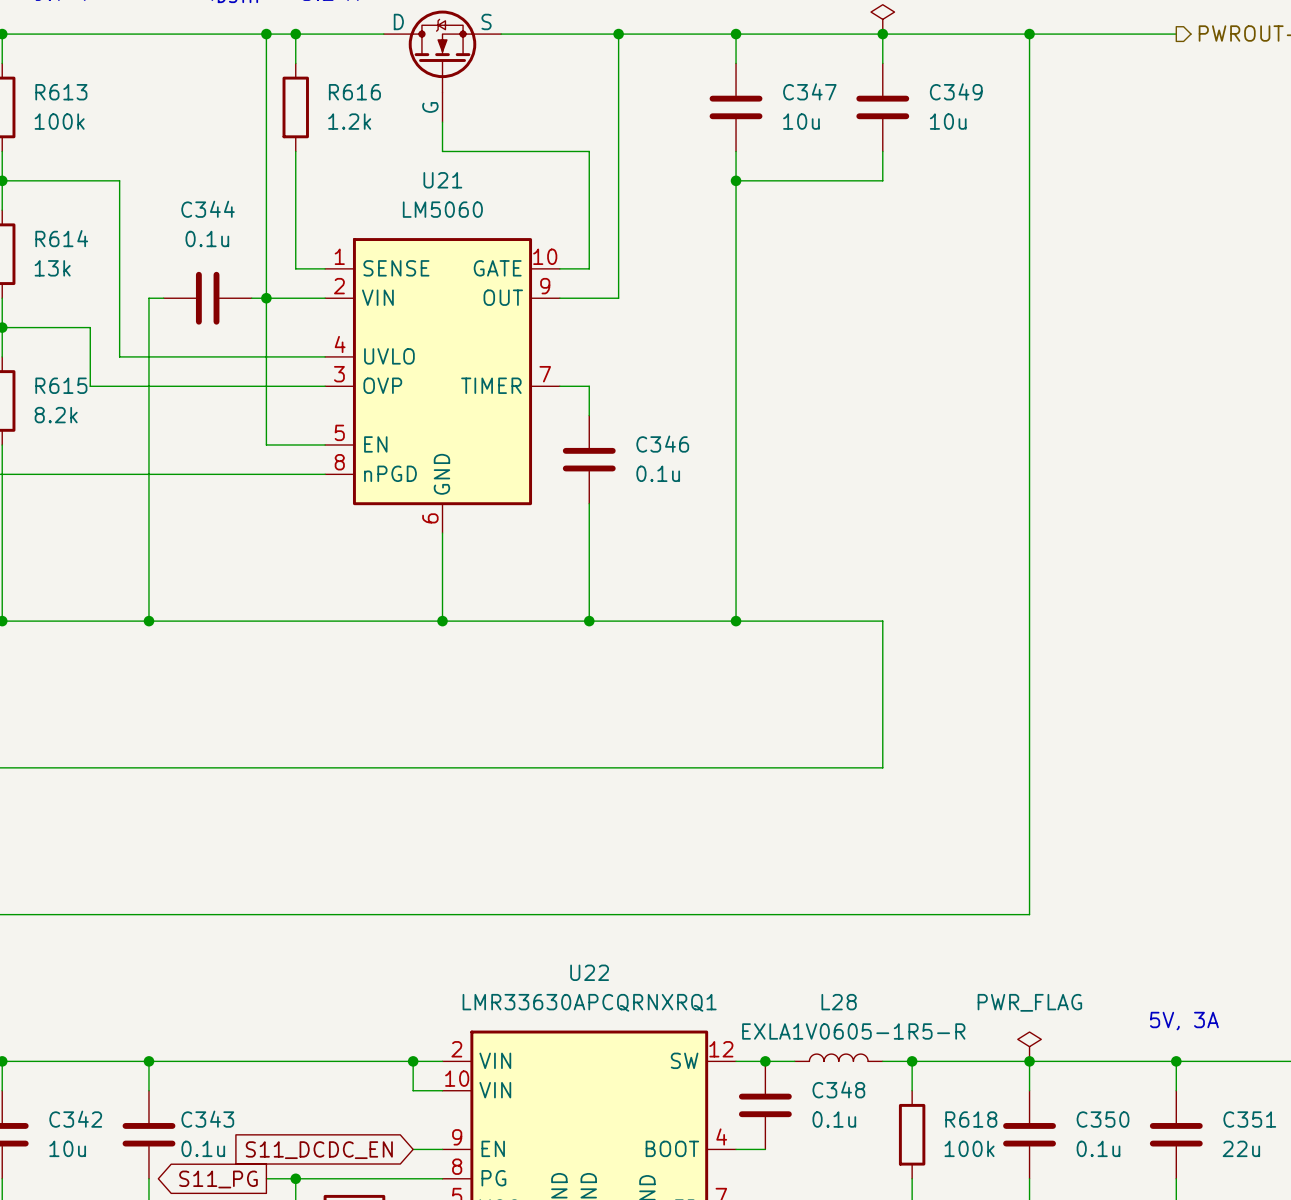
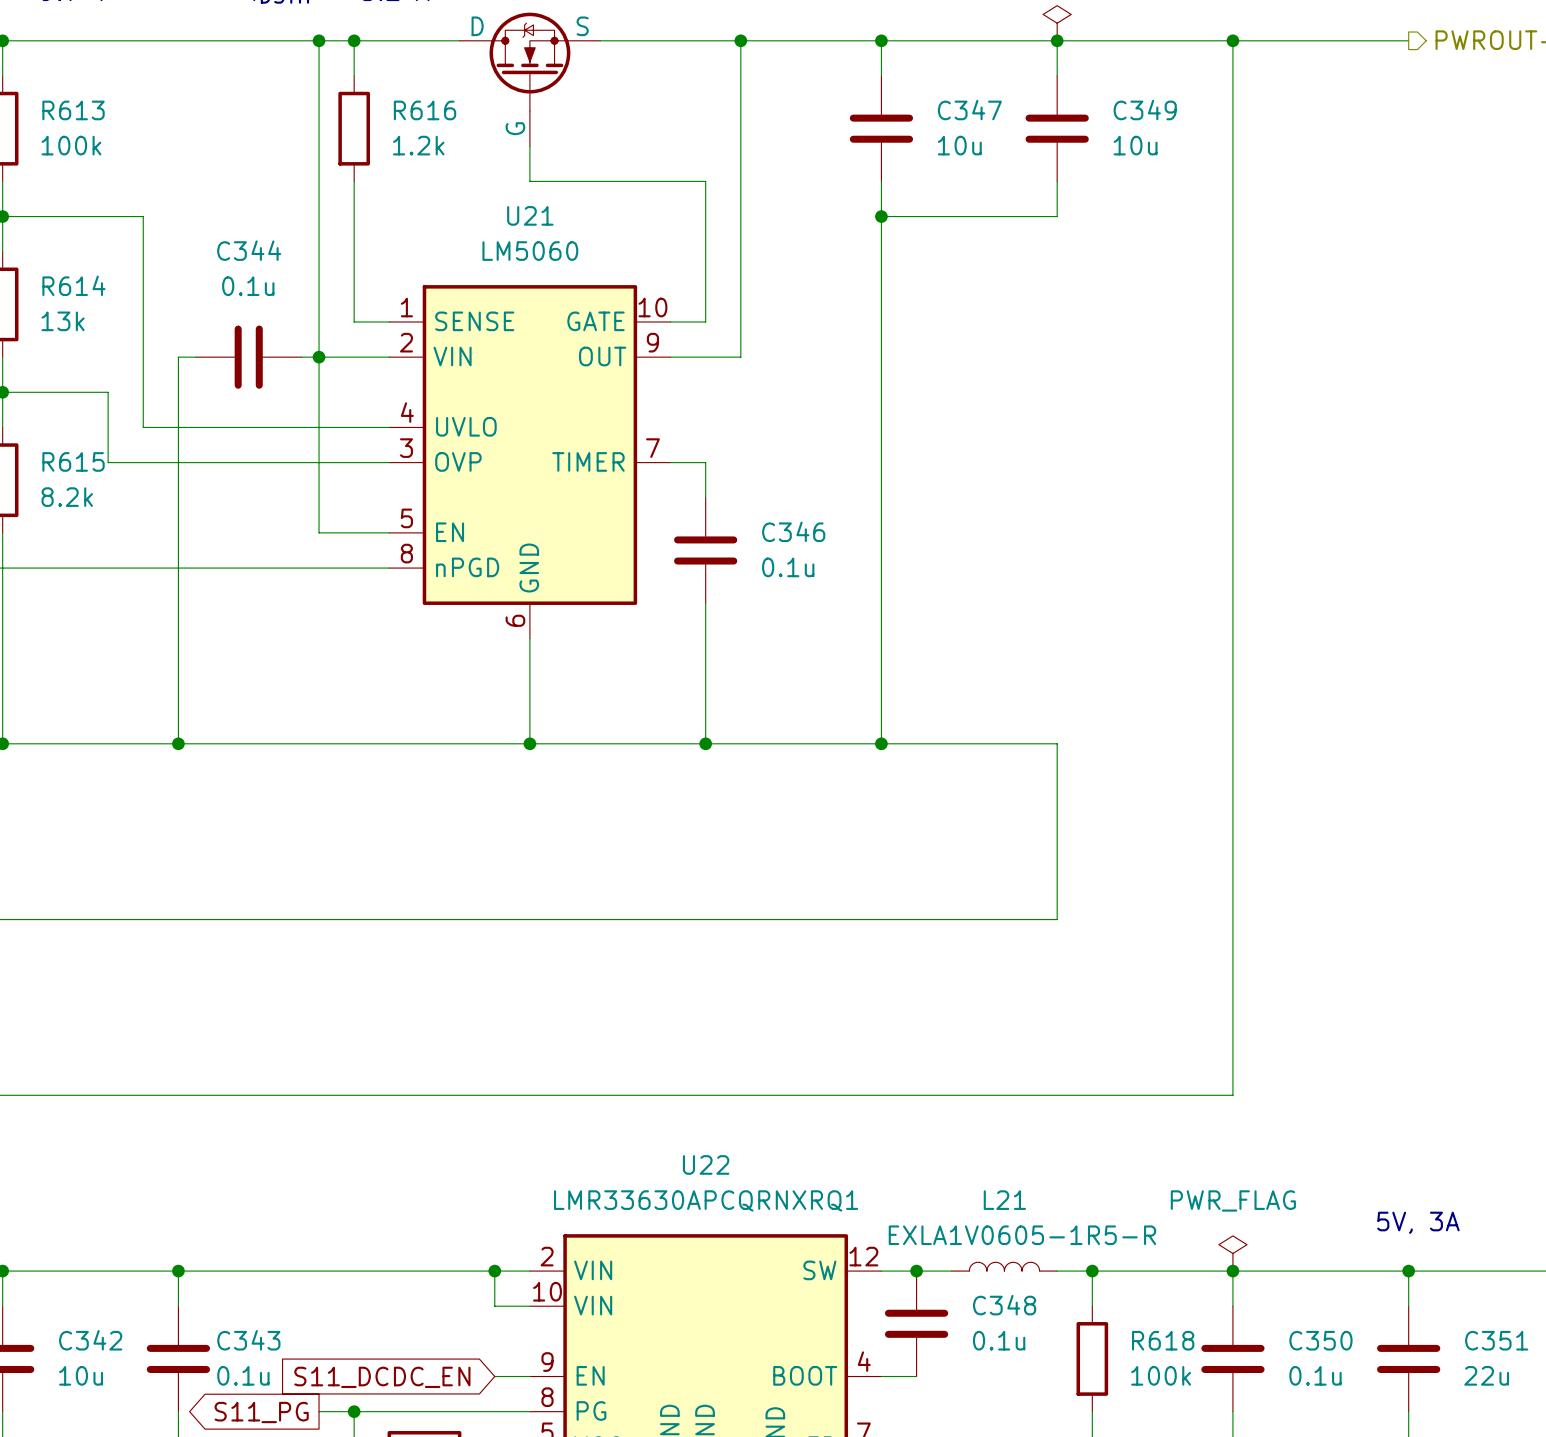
L28 name: L28 (839, 1002) -> L21 (1004, 1200)

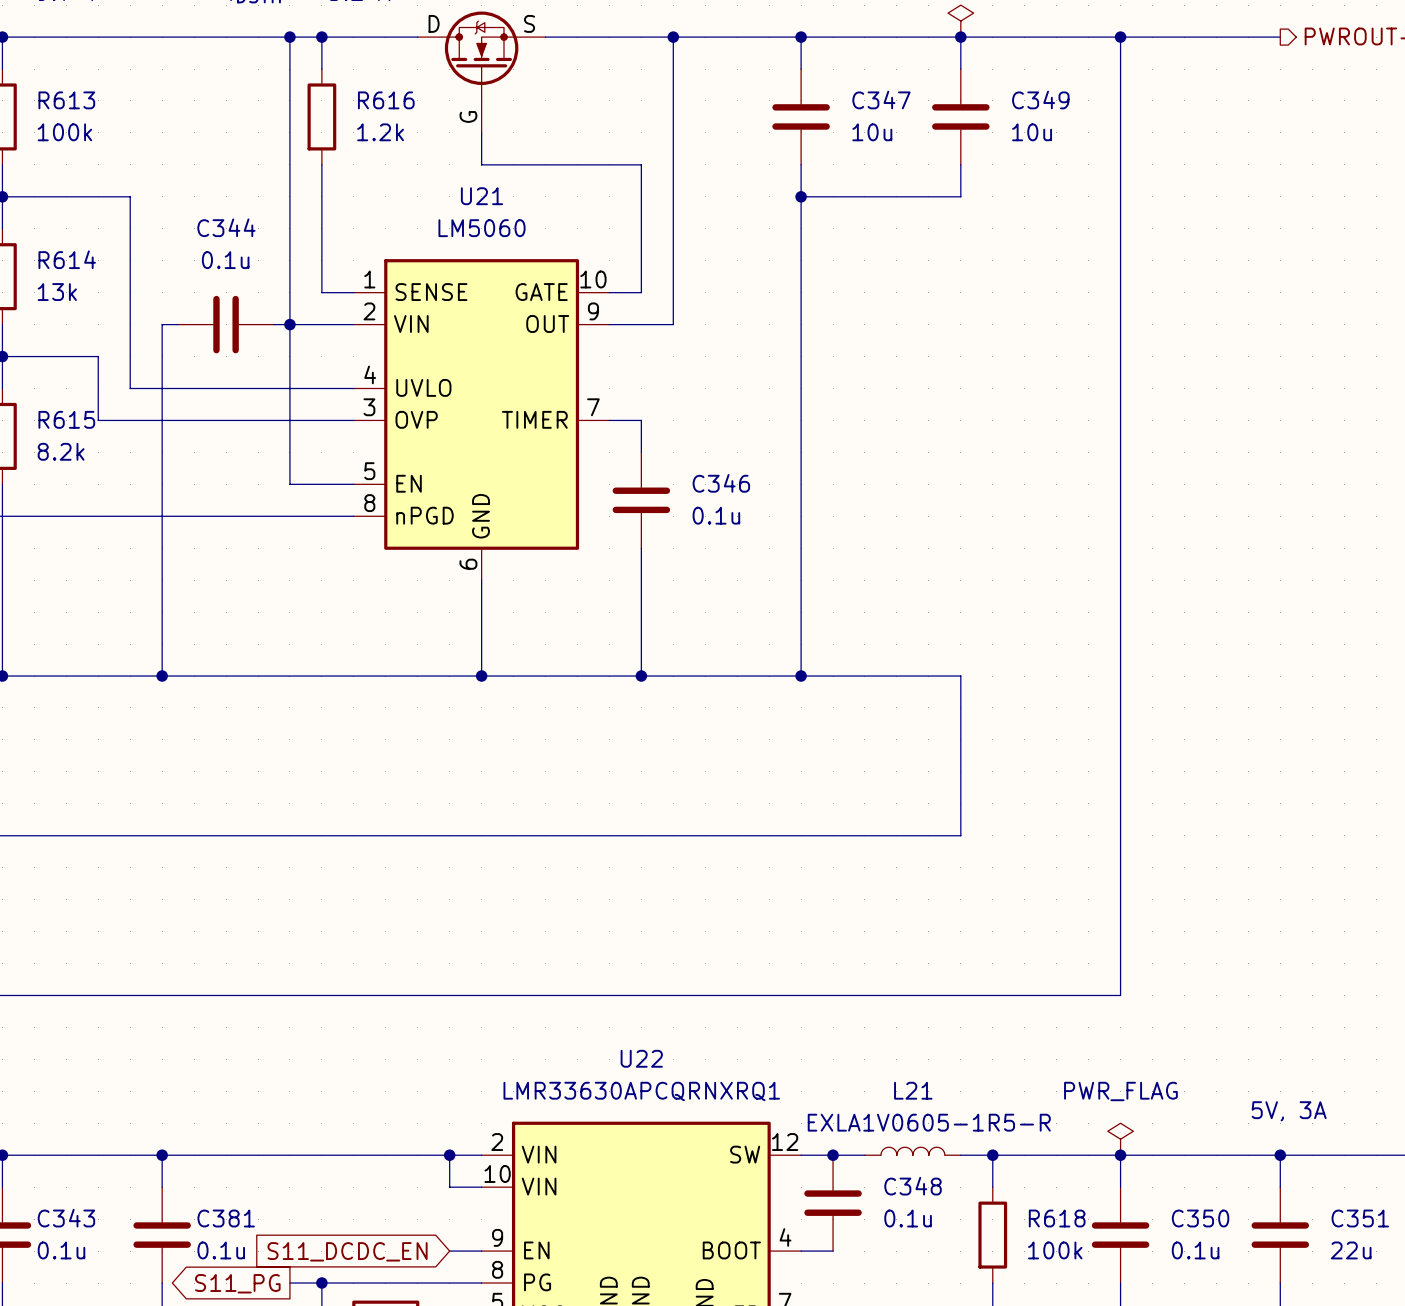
C342 name: C342 (90, 1340) -> C343 (66, 1218)
C343 name: C343 (248, 1340) -> C381 (226, 1218)
C342 value: 10u (81, 1375) -> 0.1u (61, 1250)

